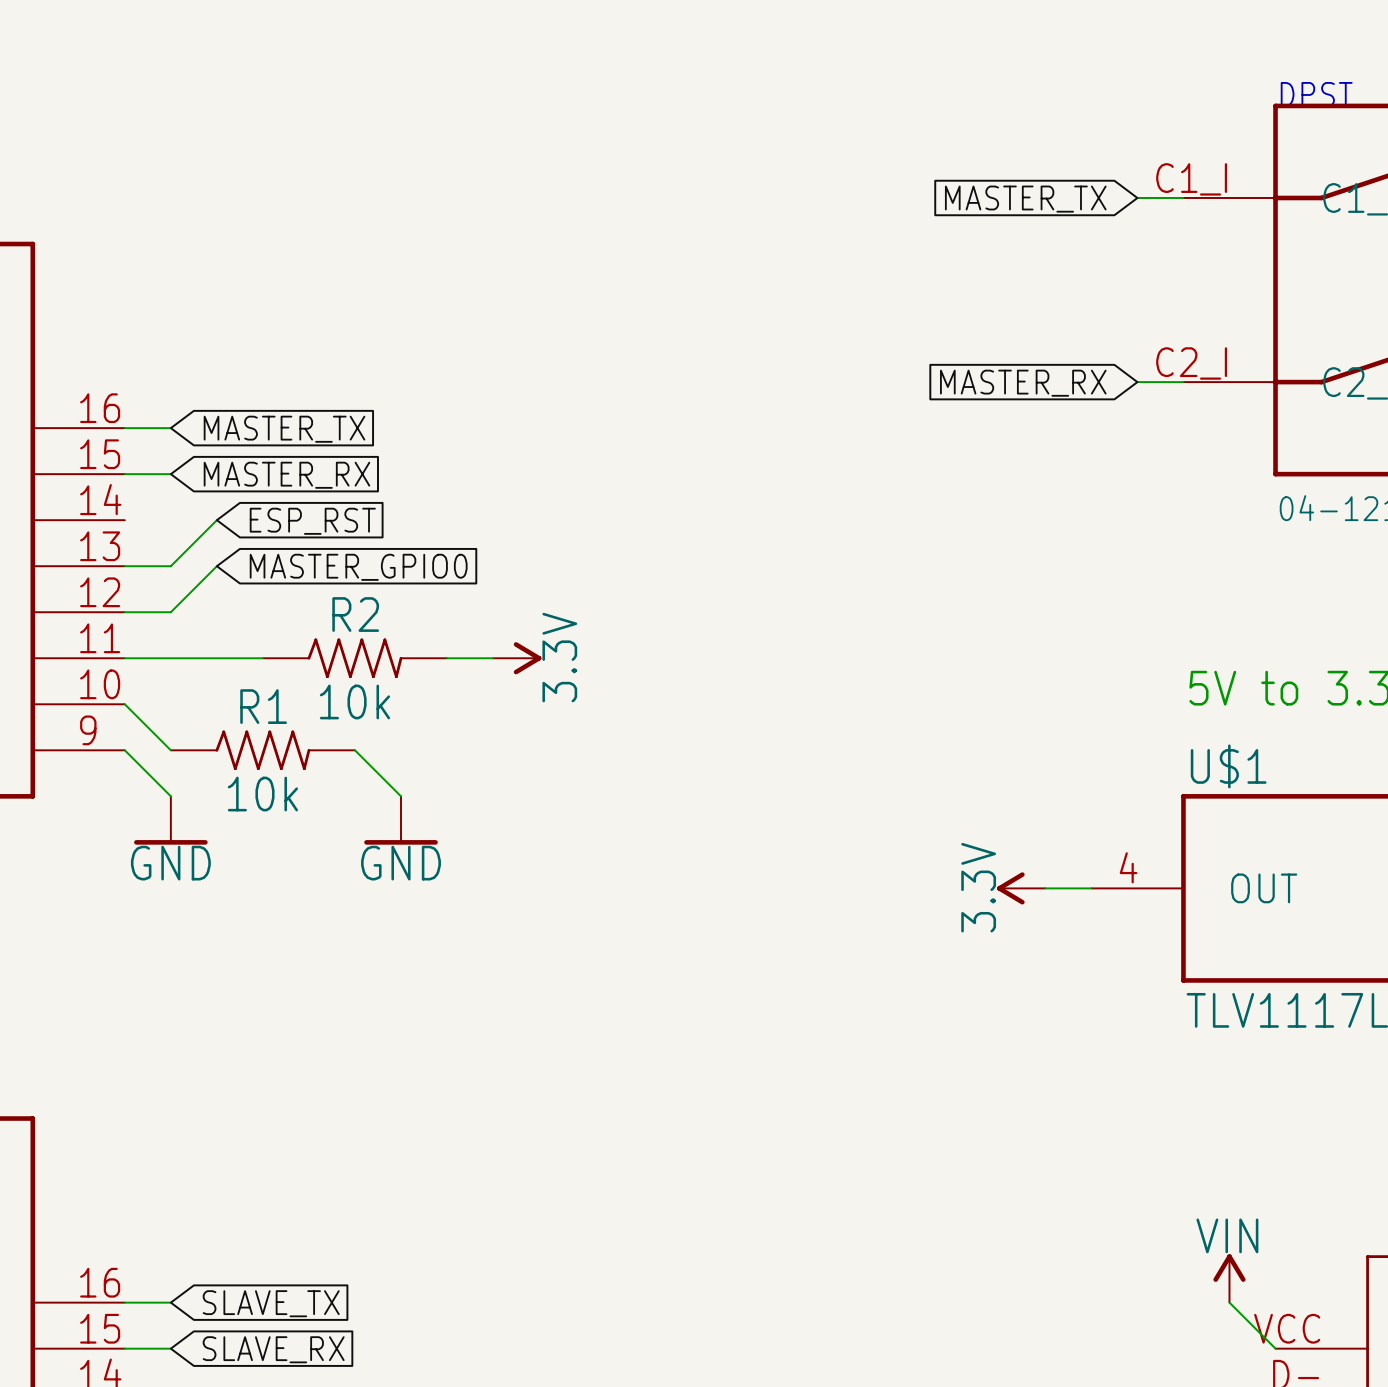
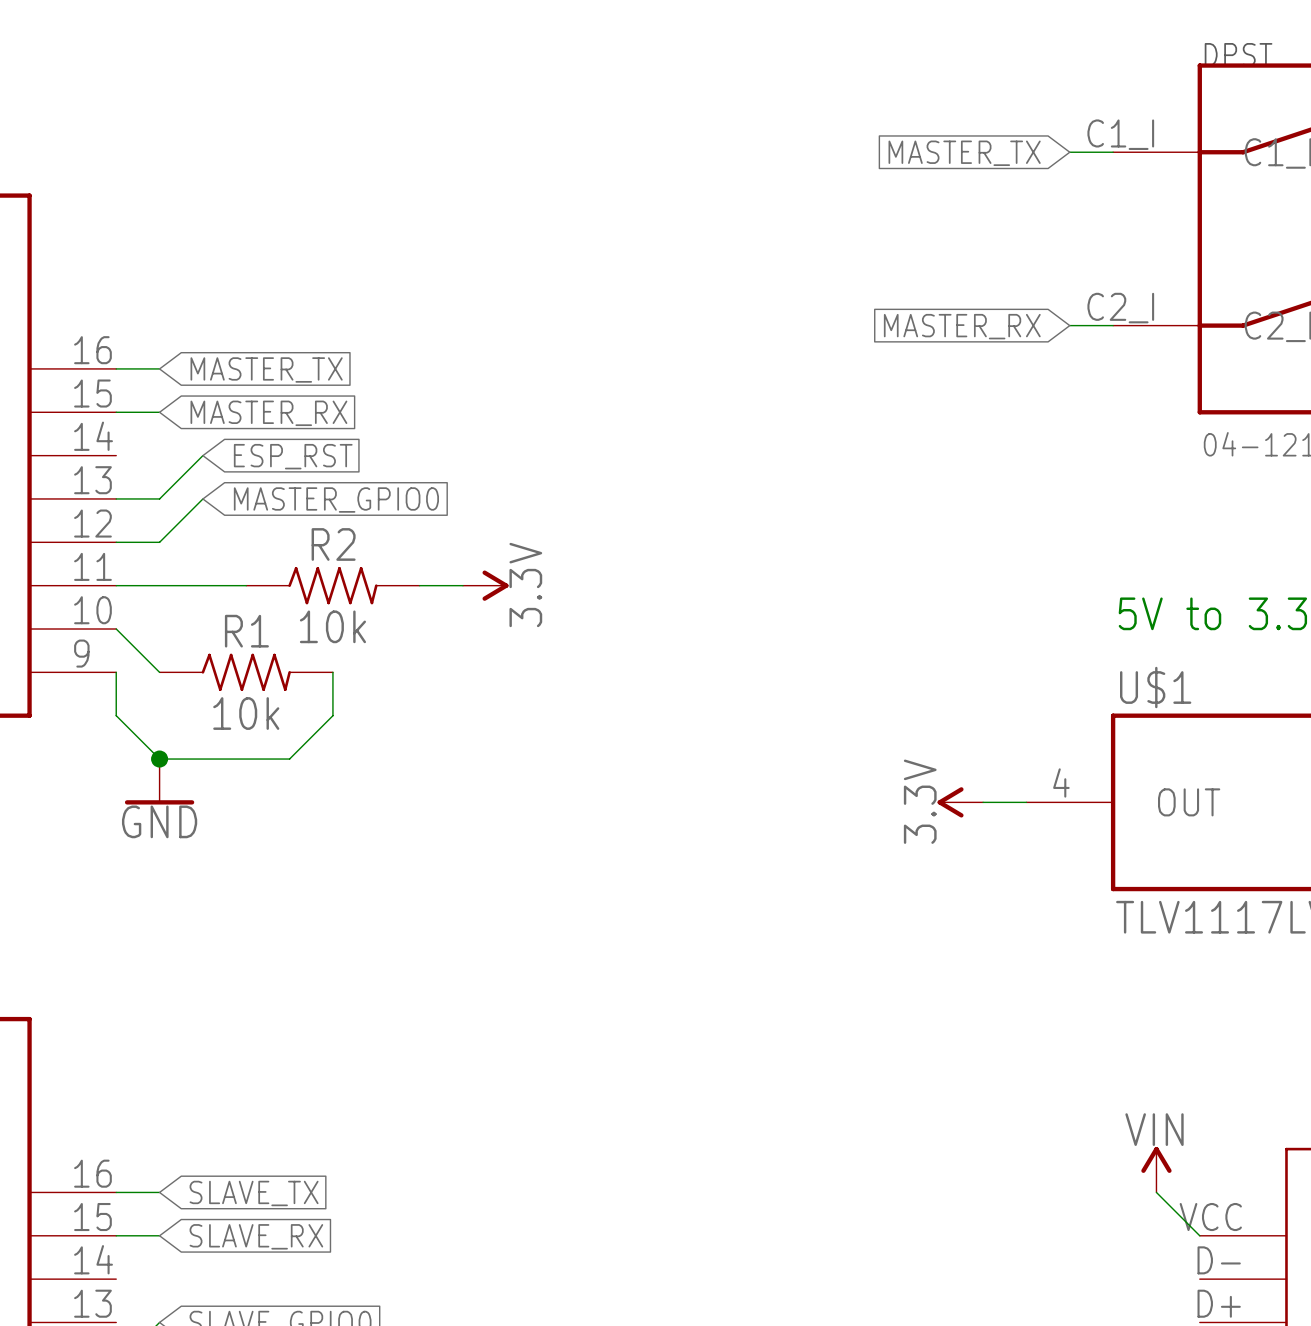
wire: (124, 750) (170, 796) -> (116, 672) (116, 715) (159, 759) (289, 759) (332, 715) (332, 672)
wire: (354, 750) (401, 796) -> none
power symbol position: GND (170, 820) -> GND (159, 781)
power symbol: GND (401, 820) -> none
junction: none -> (159, 759)

